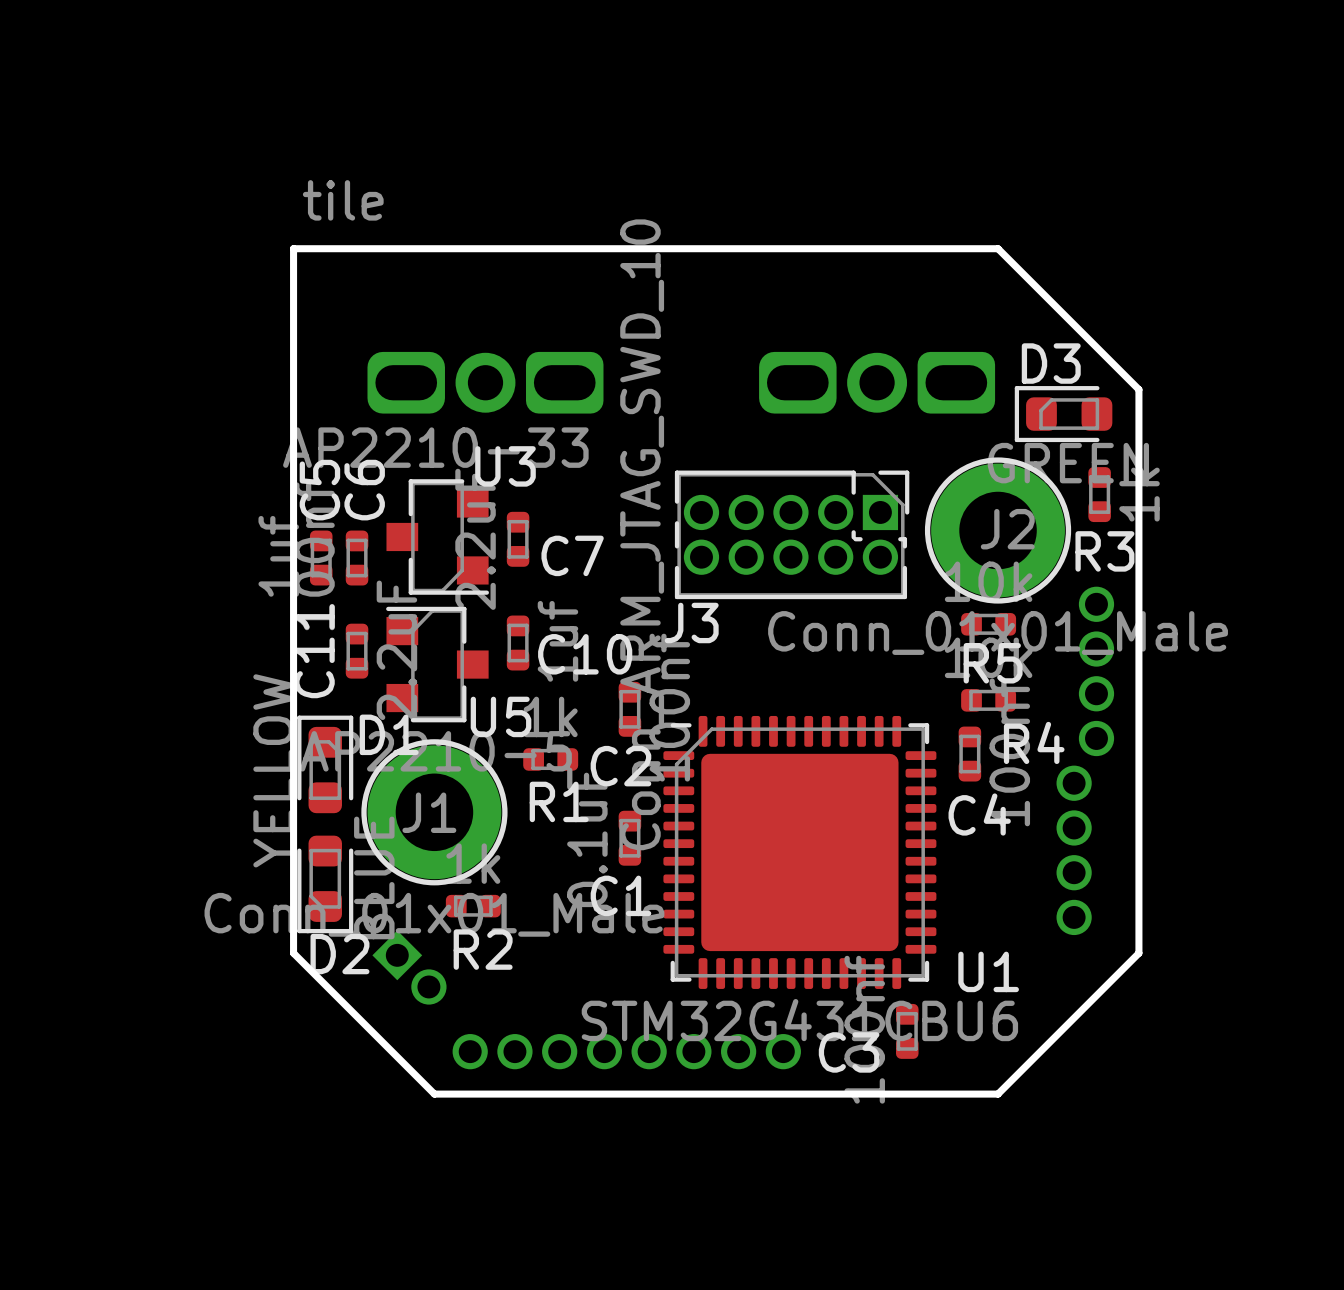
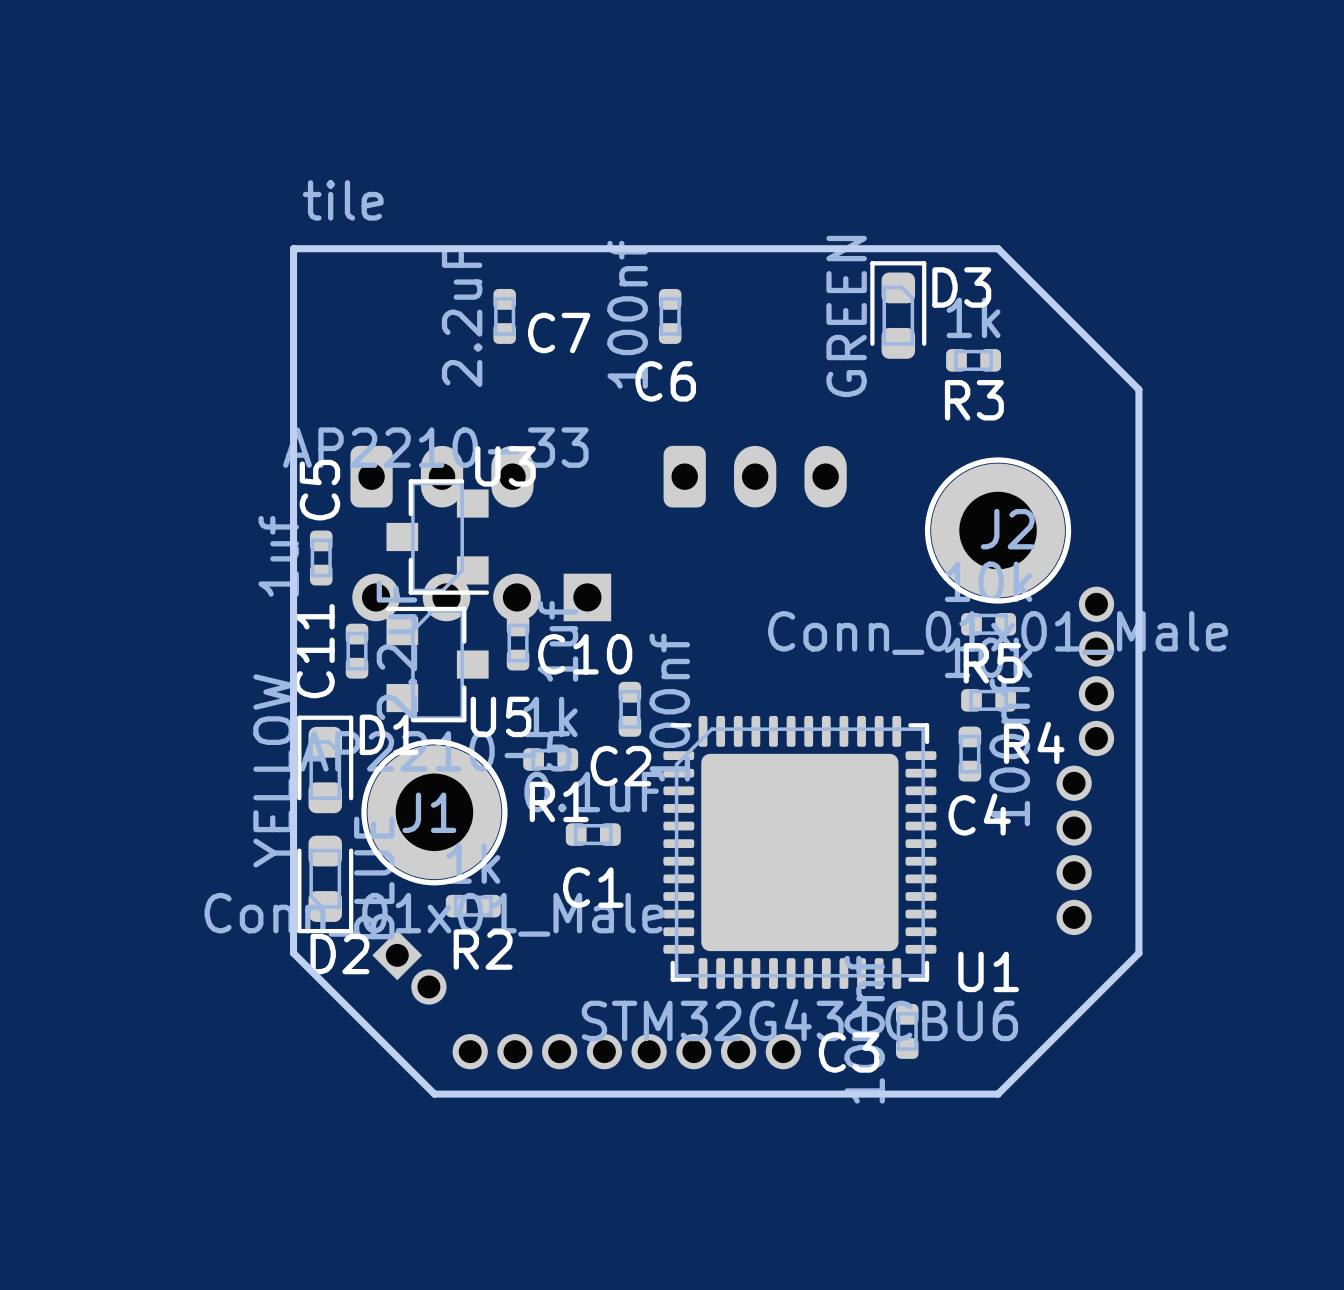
part: (485, 382) -> none
part: (877, 382) -> none
D3 rotation: 0° (1063, 414) -> 90° clockwise (898, 310)
D3 position: (1063, 414) -> (898, 310)
part: none -> (442, 476)
part: none -> (755, 476)
C6 name rotation: 0° (364, 490) -> 90° clockwise (665, 381)
C6 name position: C6 (364, 490) -> C6 (665, 381)
R3 rotation: 0° (1099, 494) -> 90° clockwise (973, 360)
R3 position: (1099, 494) -> (973, 360)
J3: Conn_ARM_JTAG_SWD_10 (792, 534) -> none
C7 position: (518, 539) -> (504, 316)
C6 position: (357, 558) -> (670, 316)
part: none -> (481, 597)
C1 rotation: 0° (629, 838) -> 90° clockwise (593, 834)
C1 position: (629, 838) -> (593, 834)

